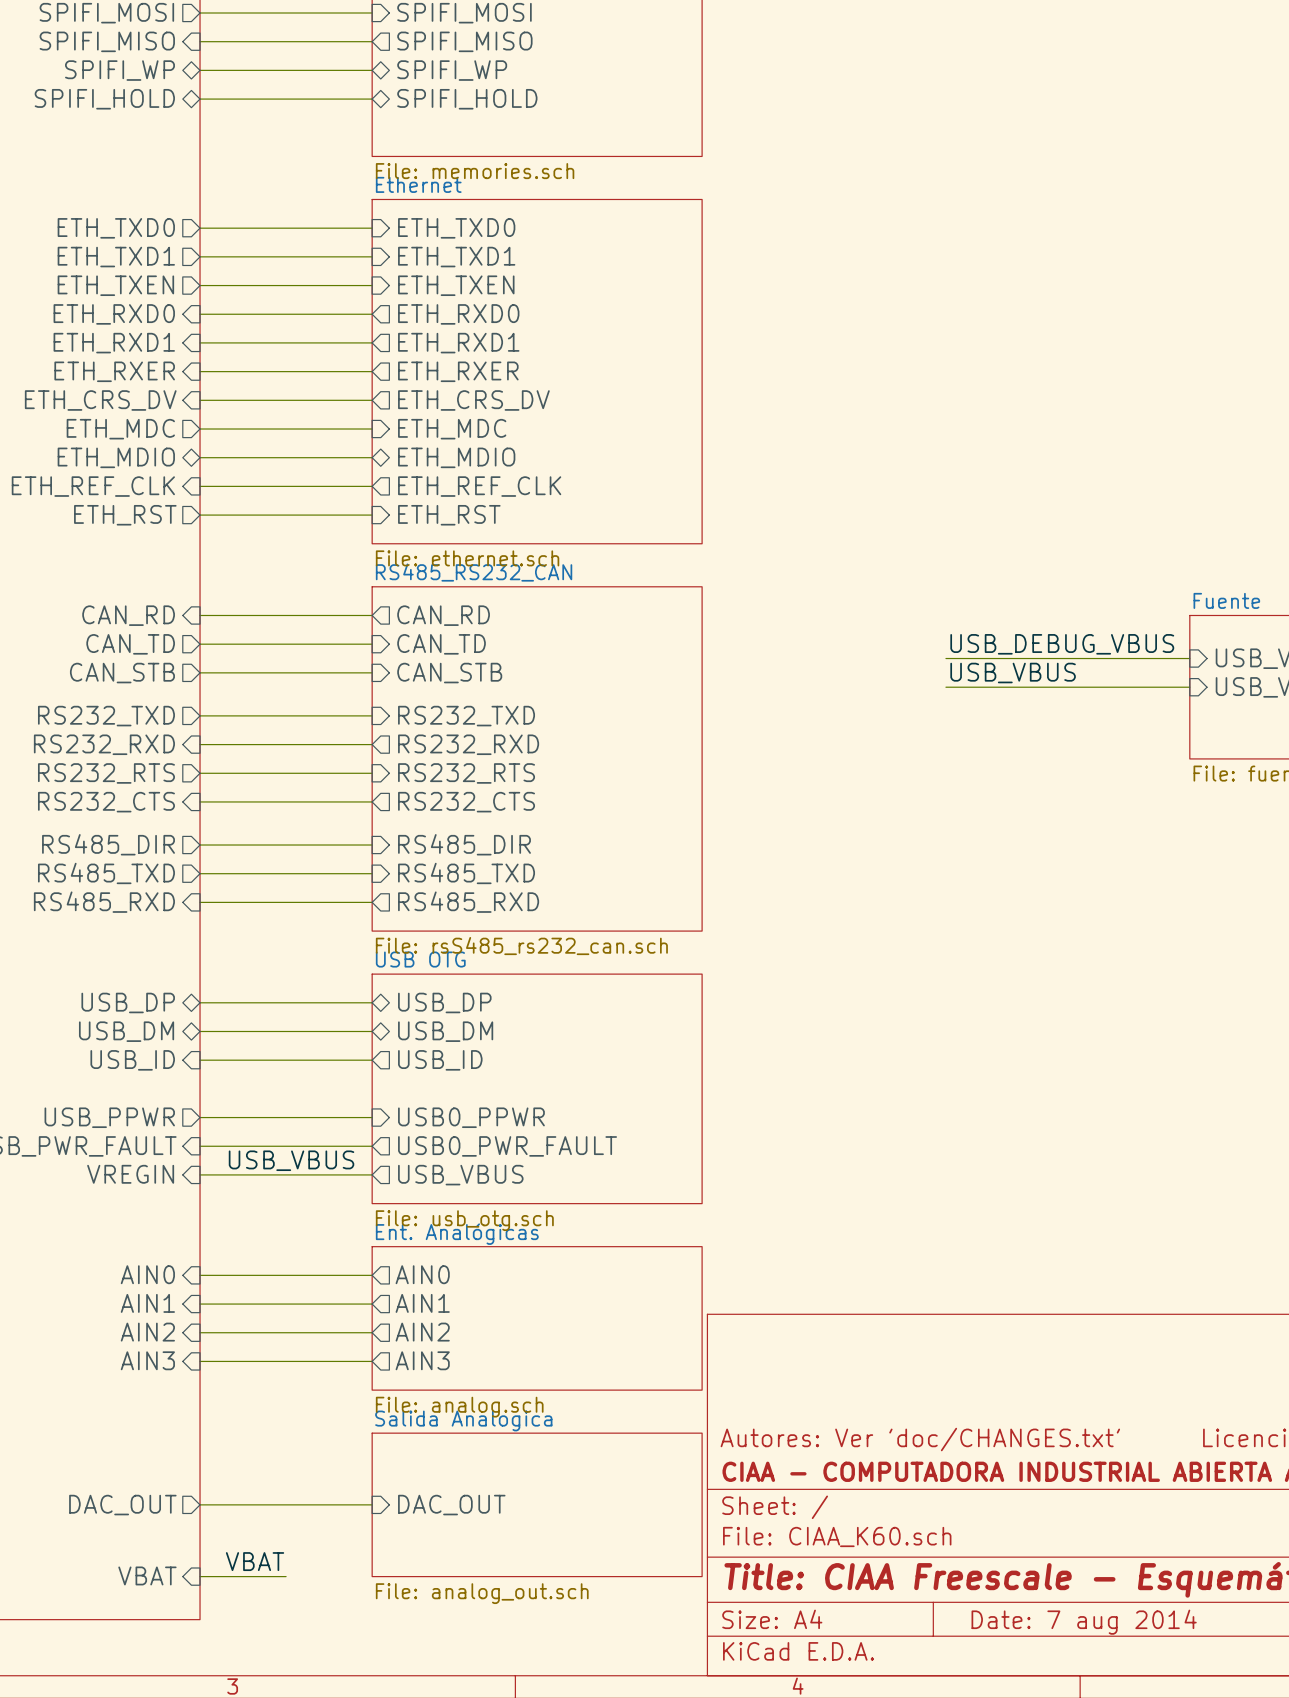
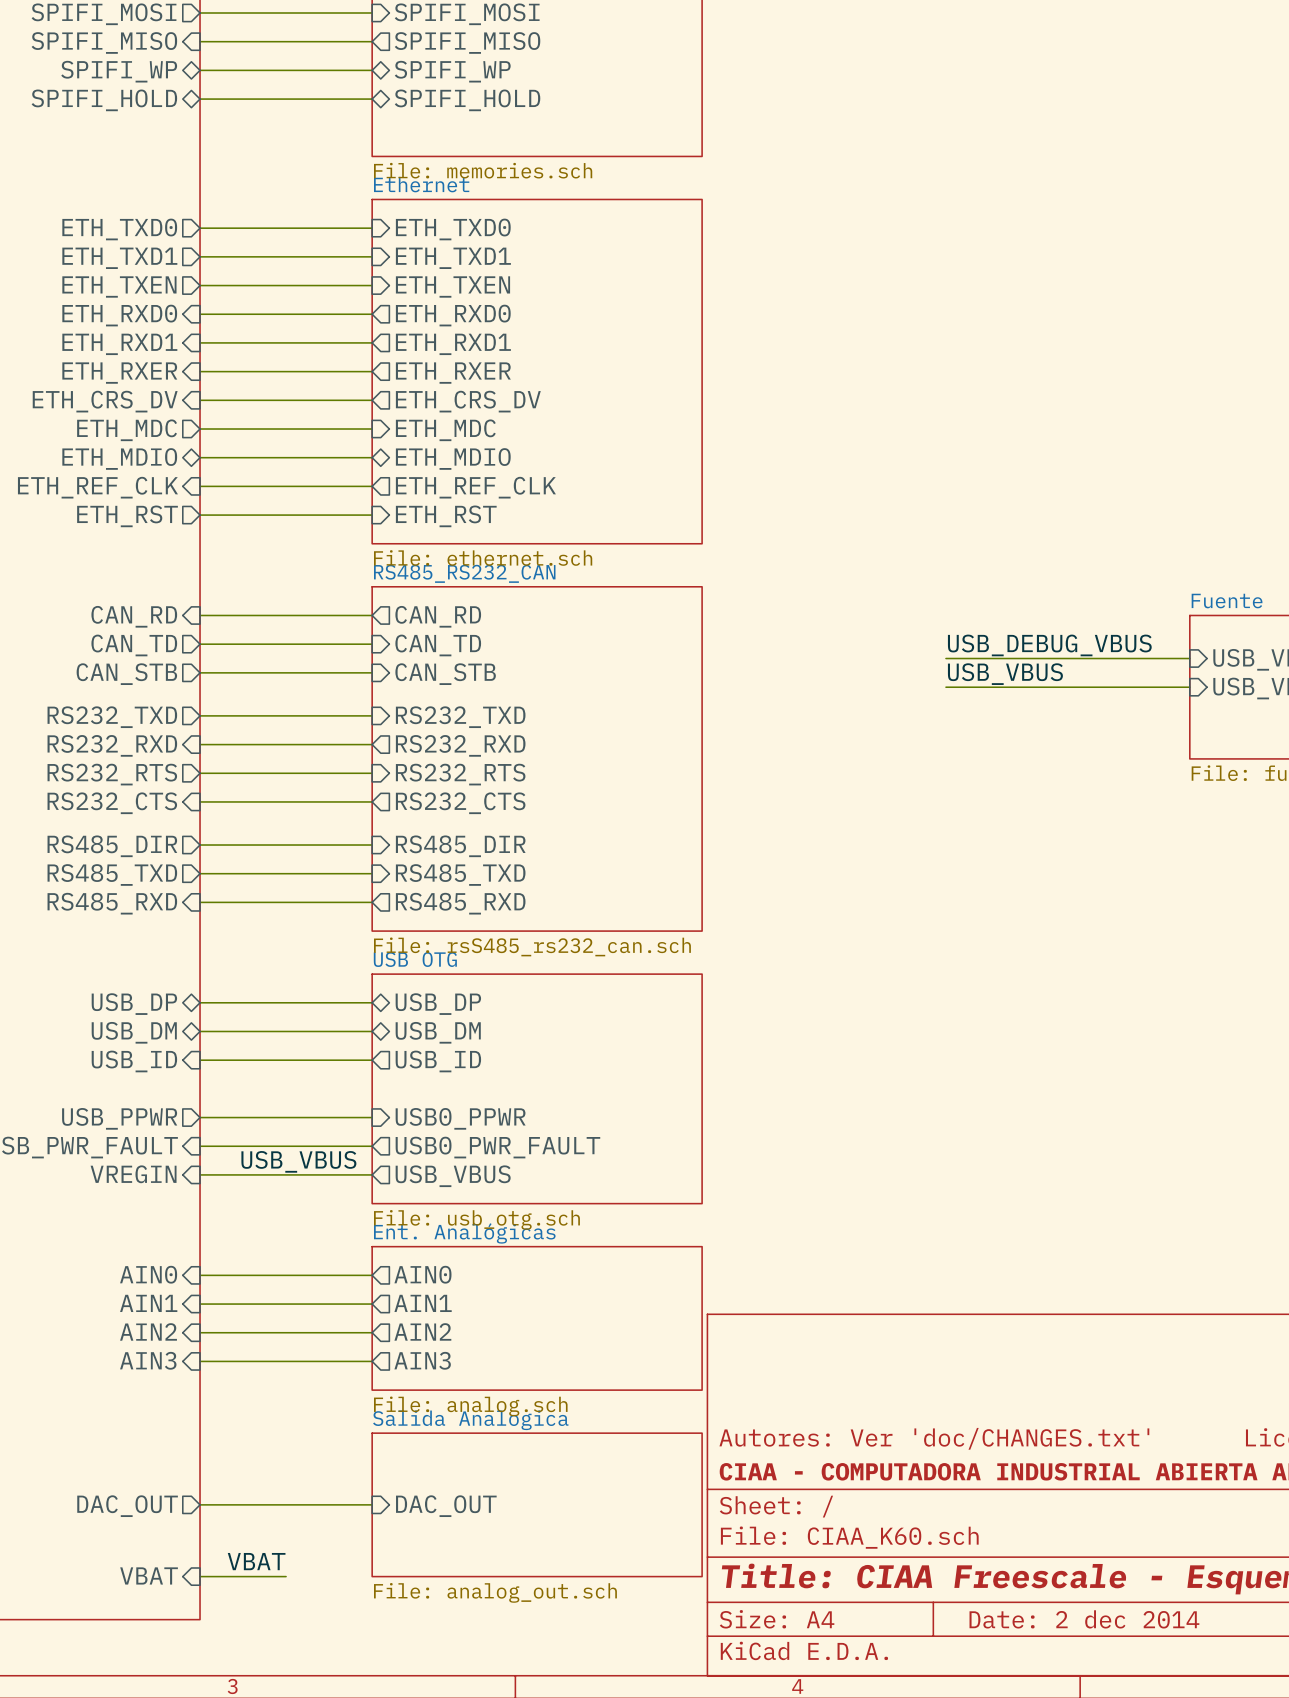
title block: Date: 7 aug 2014 (1084, 1622) -> Date: 2 dec 2014 (1084, 1619)

